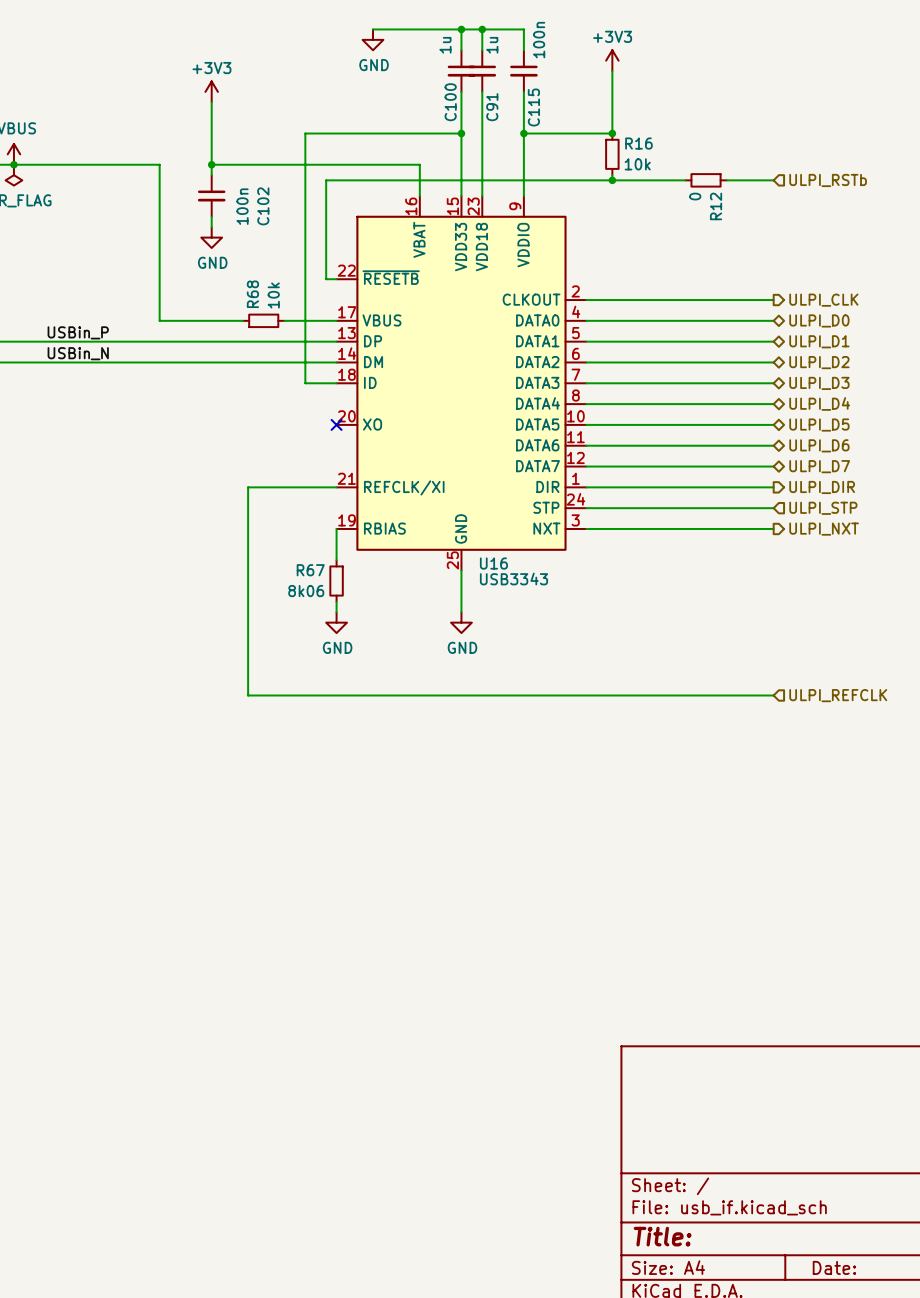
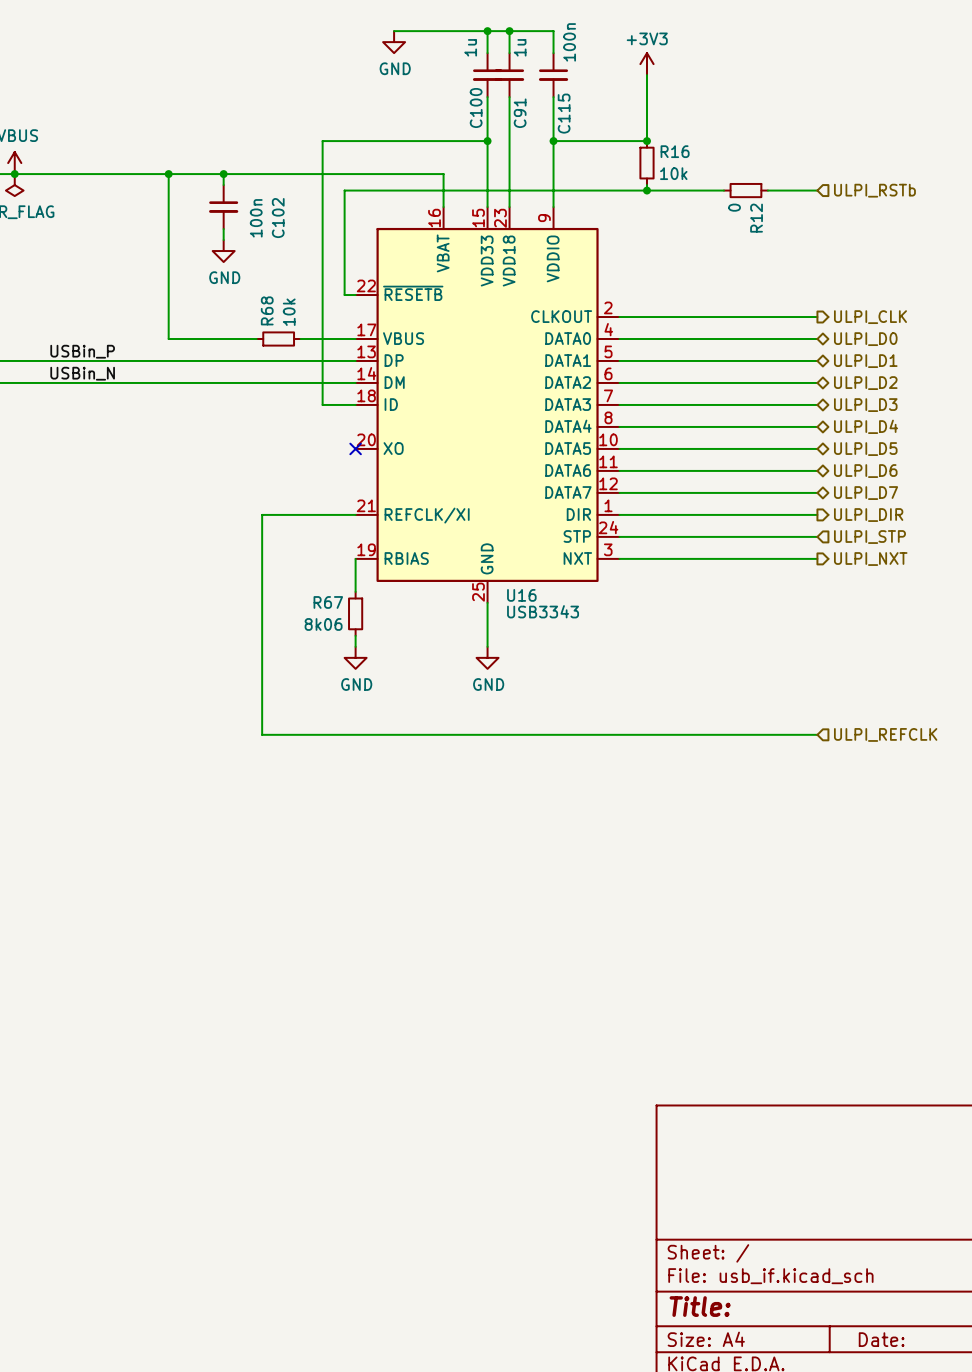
power symbol: +3V3 (211, 91) -> none
wire: (211, 102) (211, 164) -> (168, 174) (223, 174)
junction: none -> (168, 174)

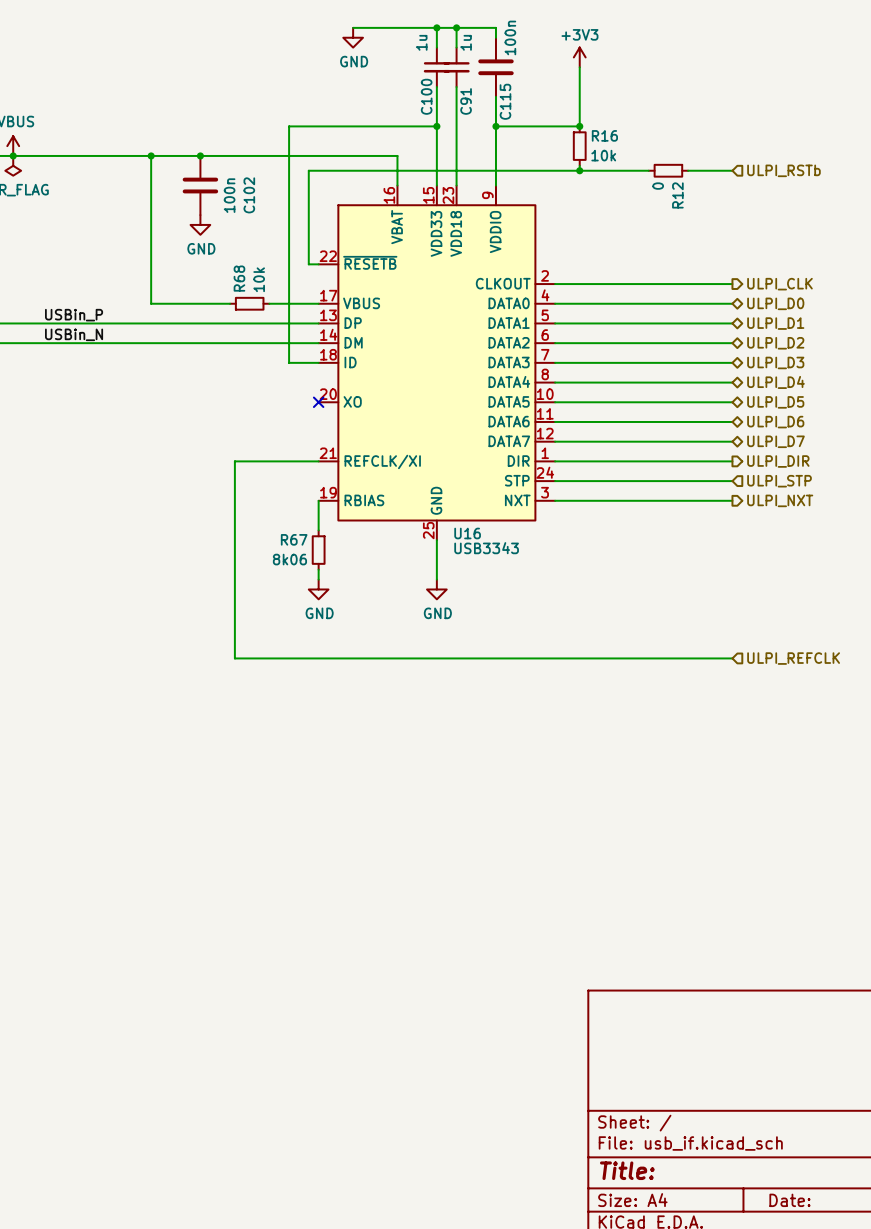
C115 symbol: [538, 53, 569, 98] -> [478, 37, 514, 97]
C102 symbol: [209, 185, 239, 230] -> [182, 155, 219, 216]

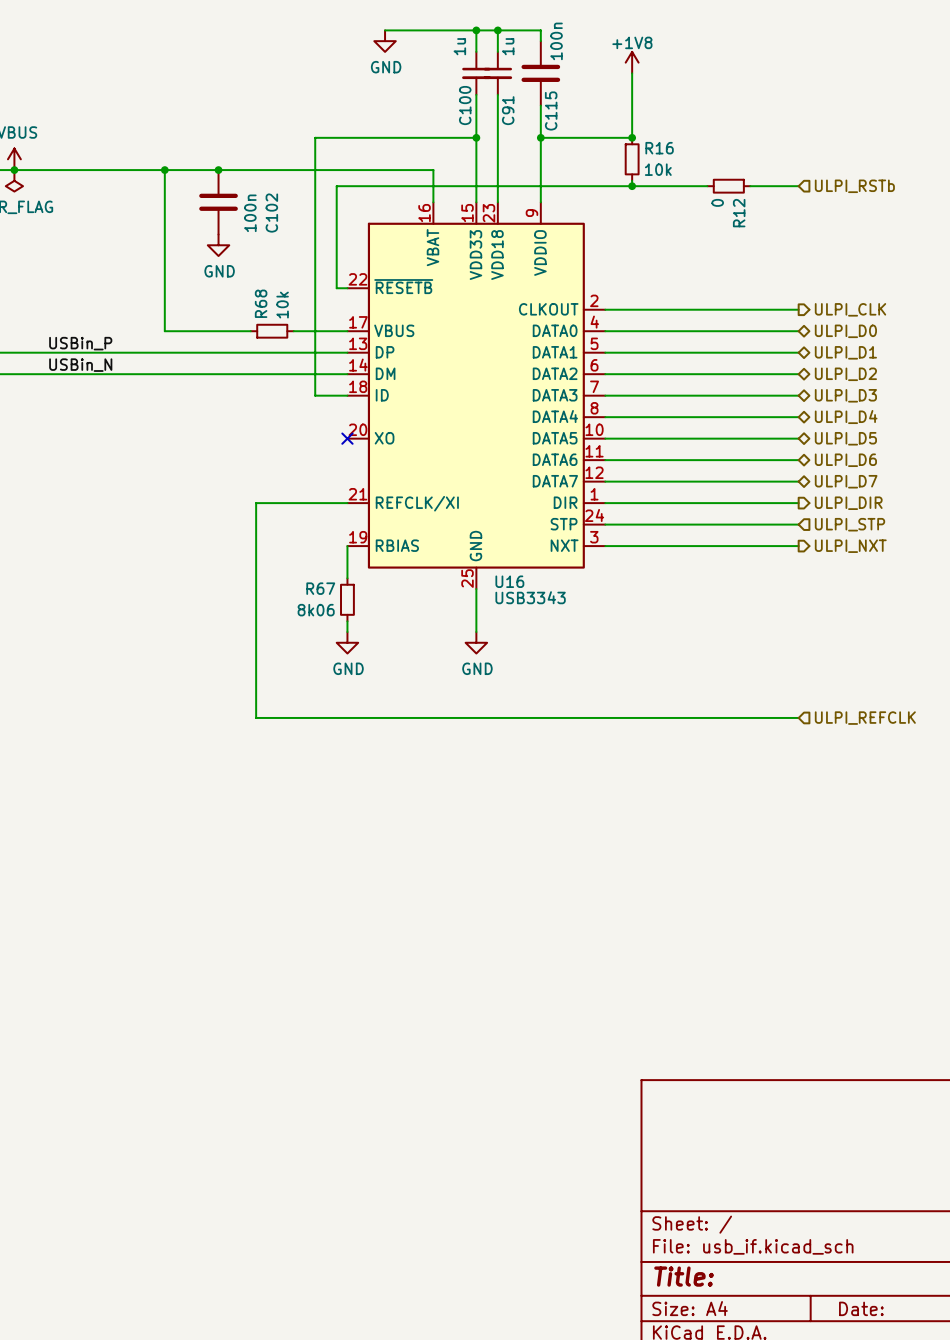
power symbol: +3V3 (579, 57) -> +1V8 (632, 62)

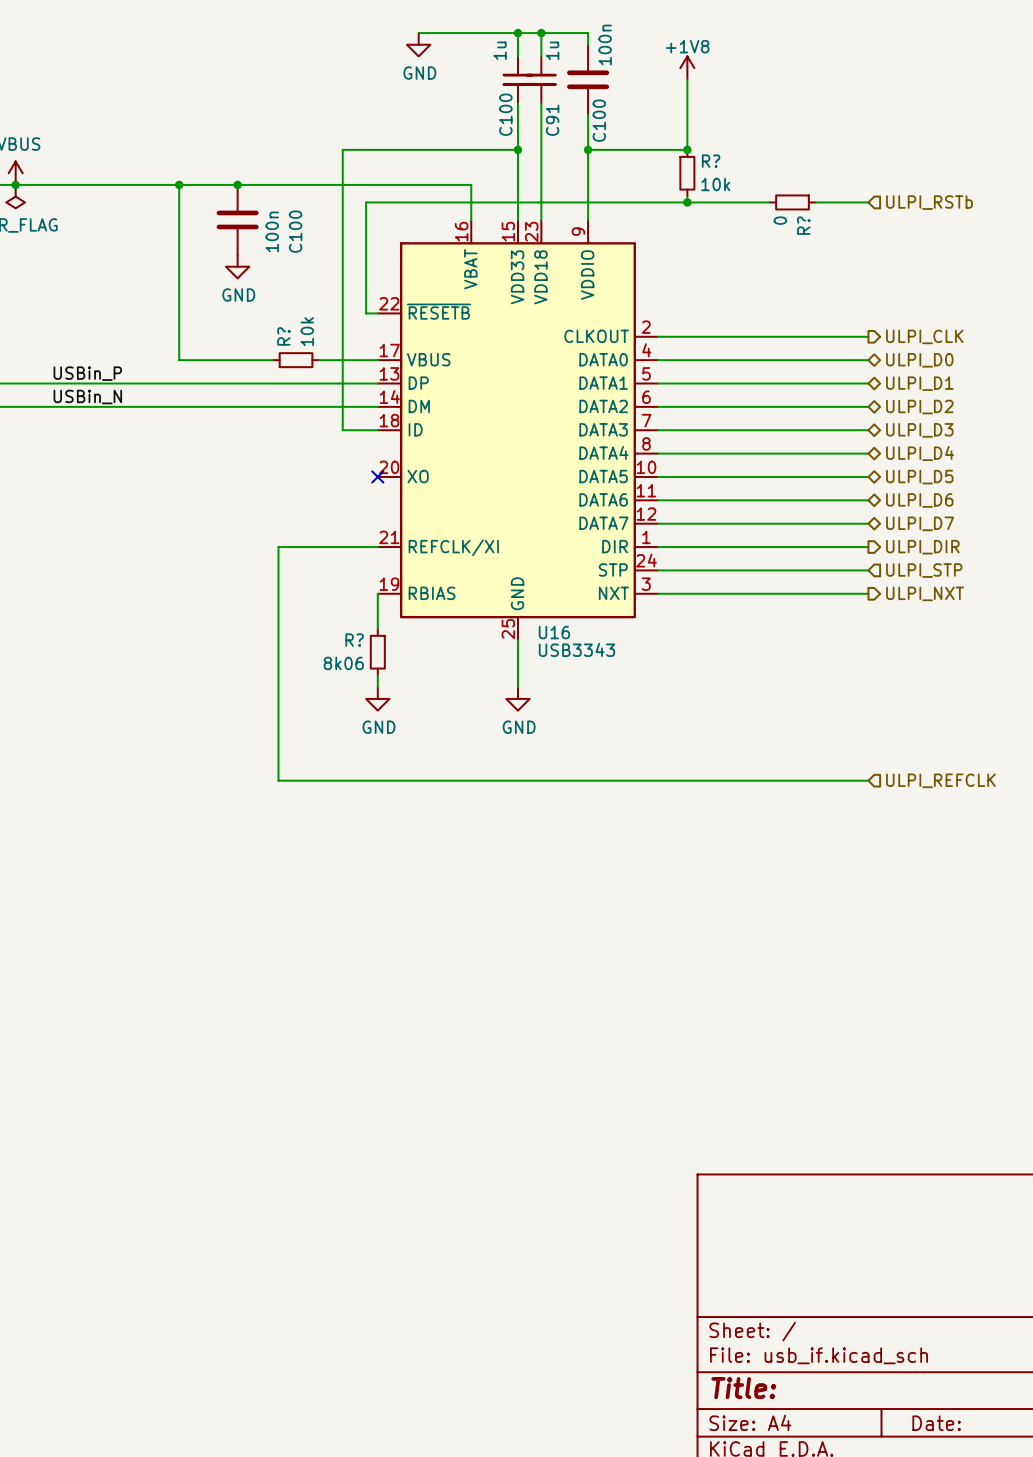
C115 name: C115 (551, 110) -> C100 (599, 120)
R16 name: R16 (659, 148) -> R? (711, 161)
C102 name: C102 (271, 213) -> C100 (295, 231)
R12 name: R12 (739, 213) -> R? (803, 225)
R68 name: R68 (261, 303) -> R? (283, 336)
R67 name: R67 (320, 588) -> R? (354, 640)

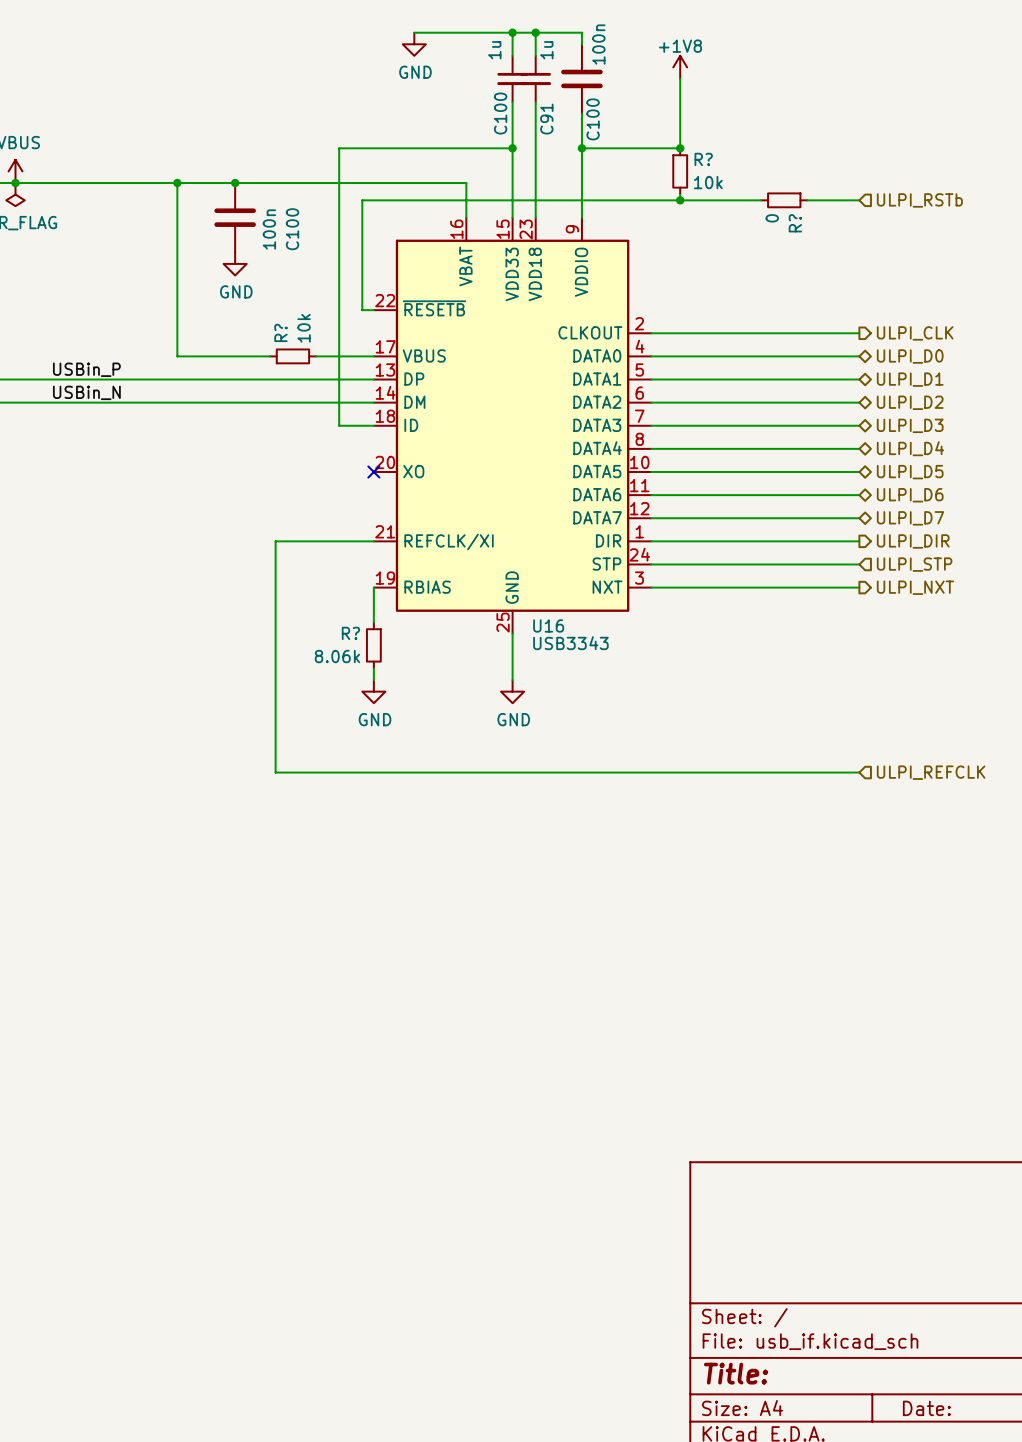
R? value: 8k06 (343, 663) -> 8.06k (337, 656)

